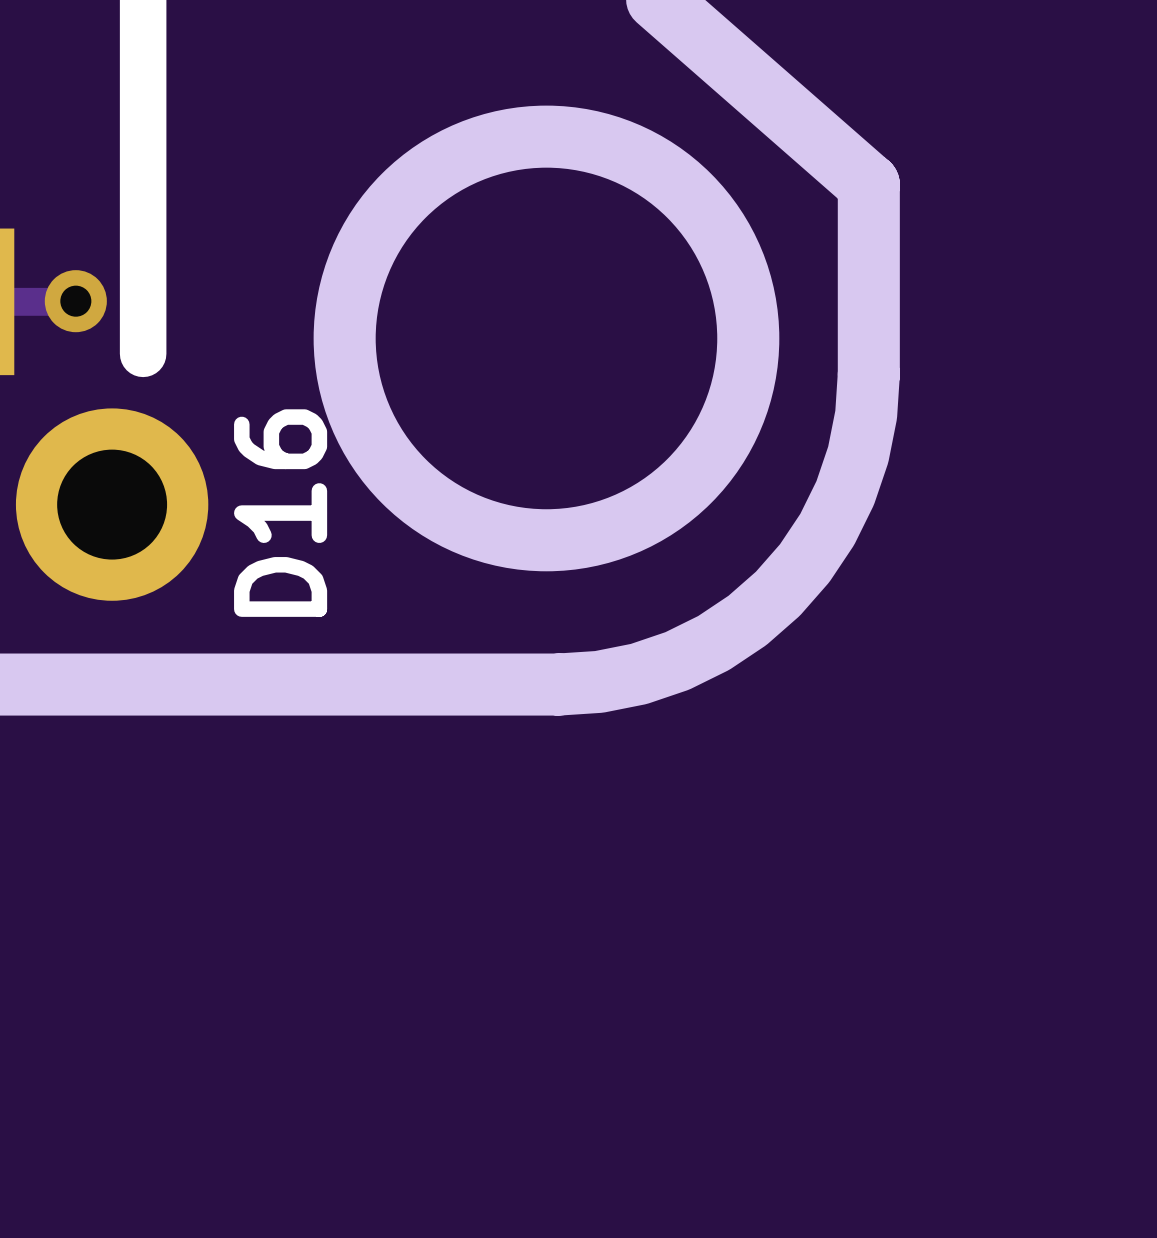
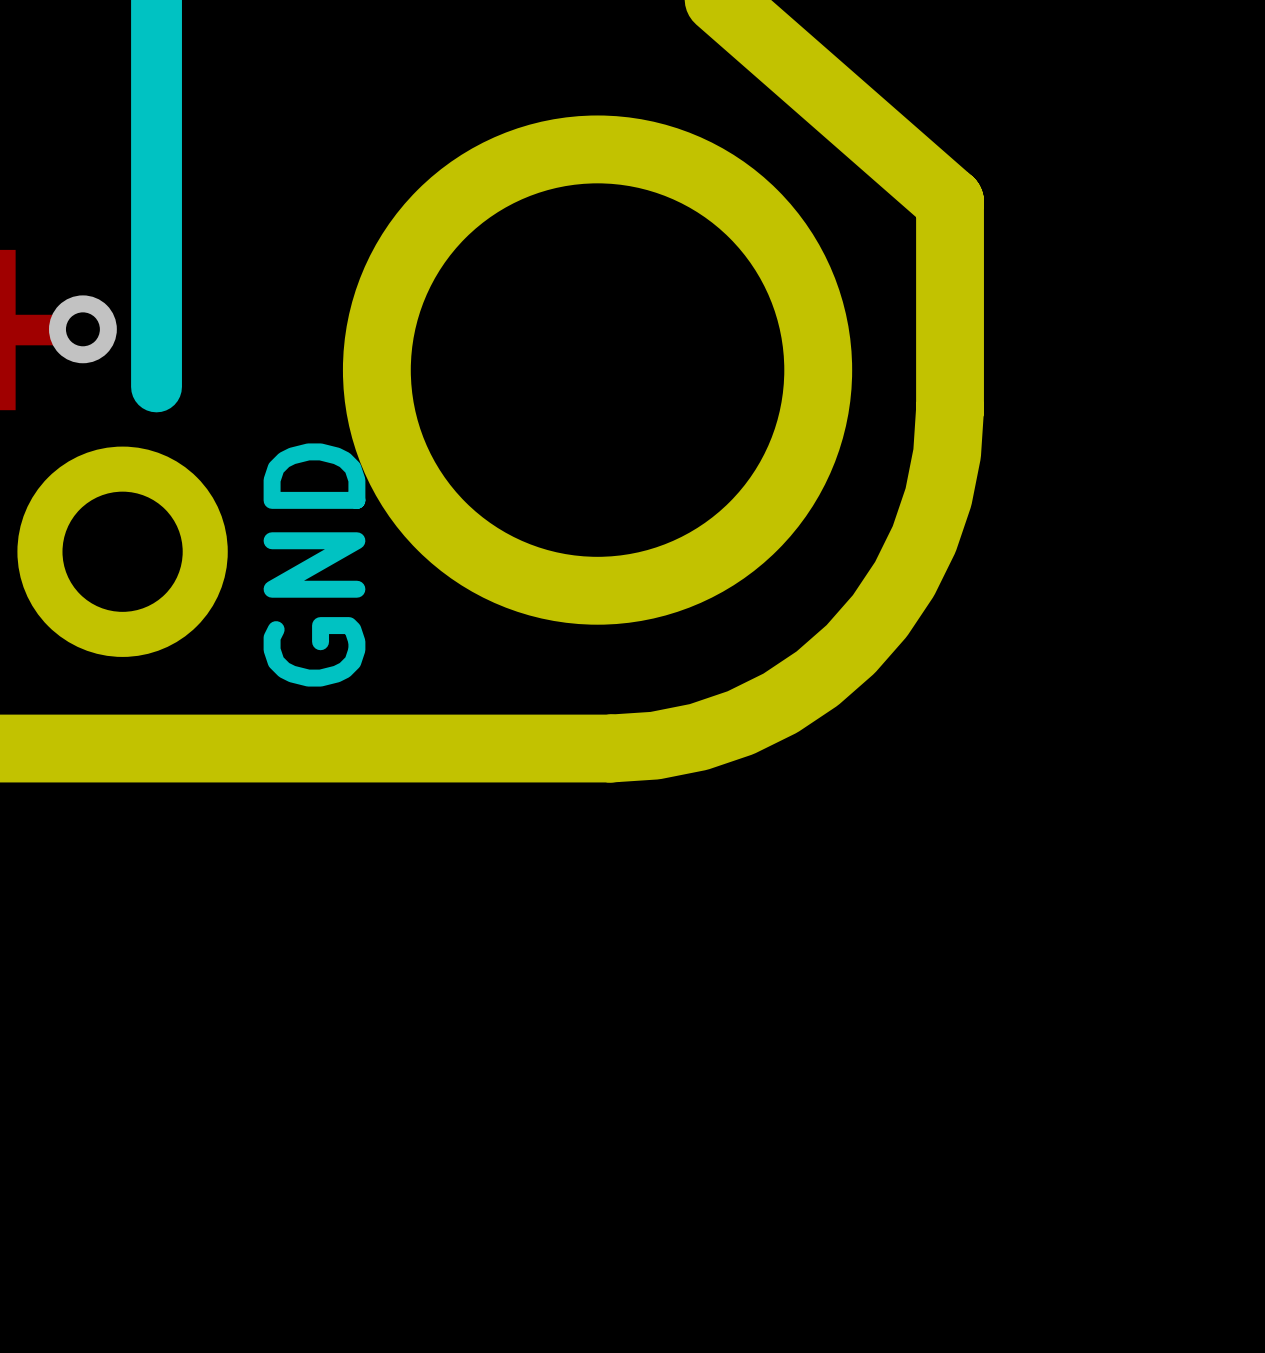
text: D16 (280, 513) -> GND (314, 564)

